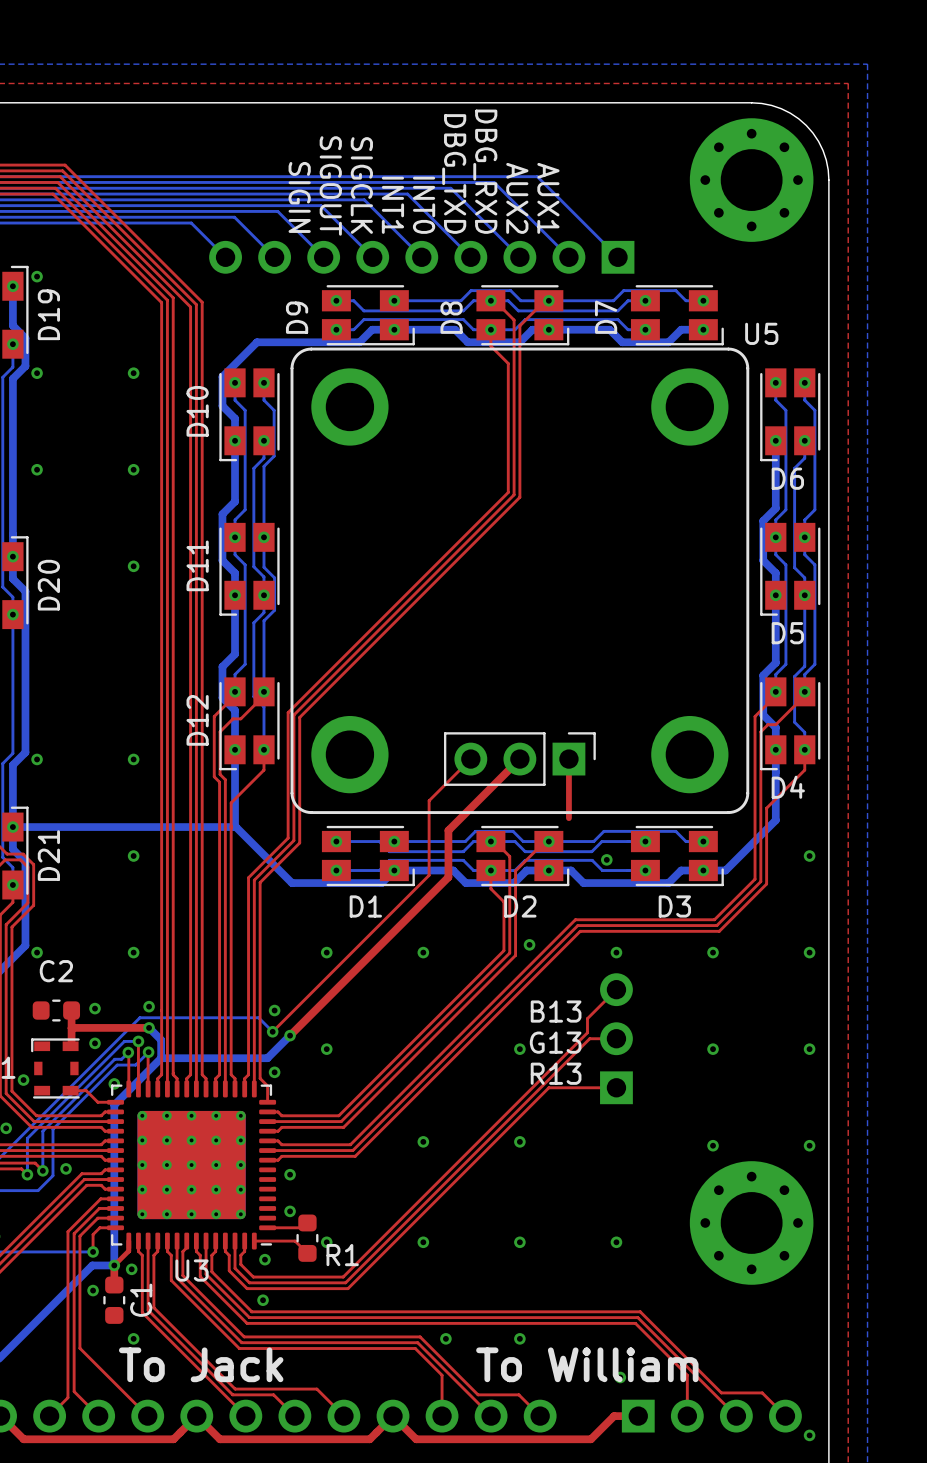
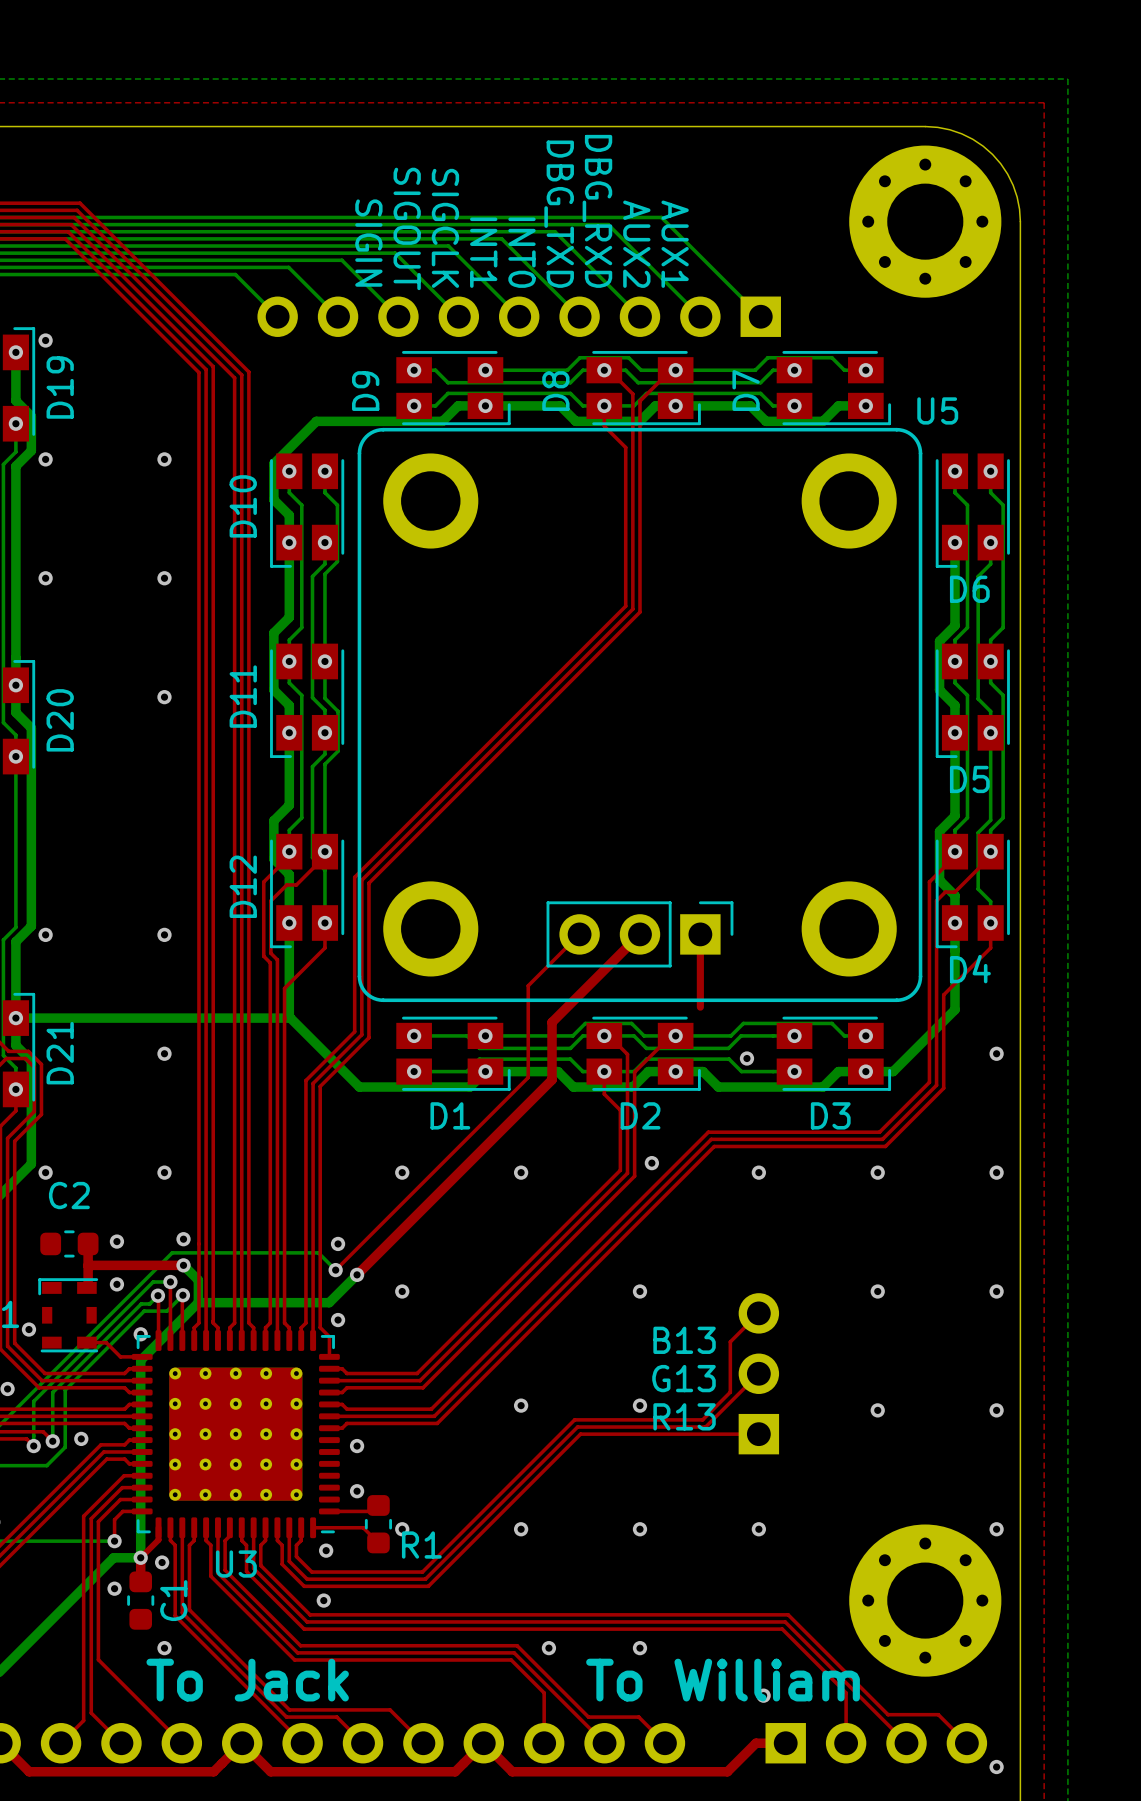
top track: (616, 989) (587, 1018) (587, 1032) (466, 1153) -> (758, 1313) (730, 1341) (730, 1392) (702, 1419) (574, 1419)
text: B13 (556, 1011) -> none
top track: (616, 1038) (589, 1038) (469, 1159) -> (758, 1373) (705, 1427) (577, 1427)
part position: (616, 1038) -> (758, 1373)
text position: G13 (555, 1042) -> G13 (683, 1378)
text: R13 (556, 1073) -> B13 (684, 1340)
top track: (616, 1087) (548, 1087) (471, 1165) -> (758, 1434) (580, 1434)
text: none -> R13 (684, 1416)
part position: (751, 1222) -> (925, 1600)
via: none -> (996, 1529)

